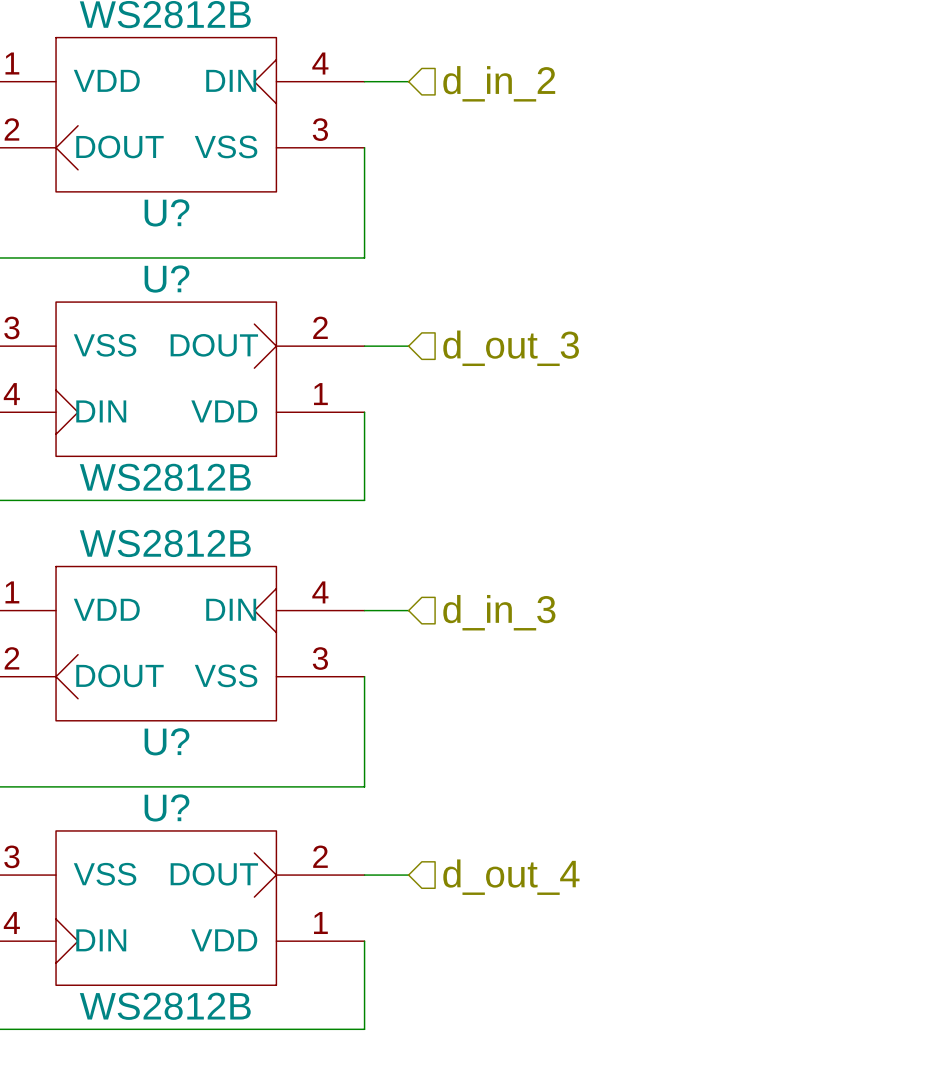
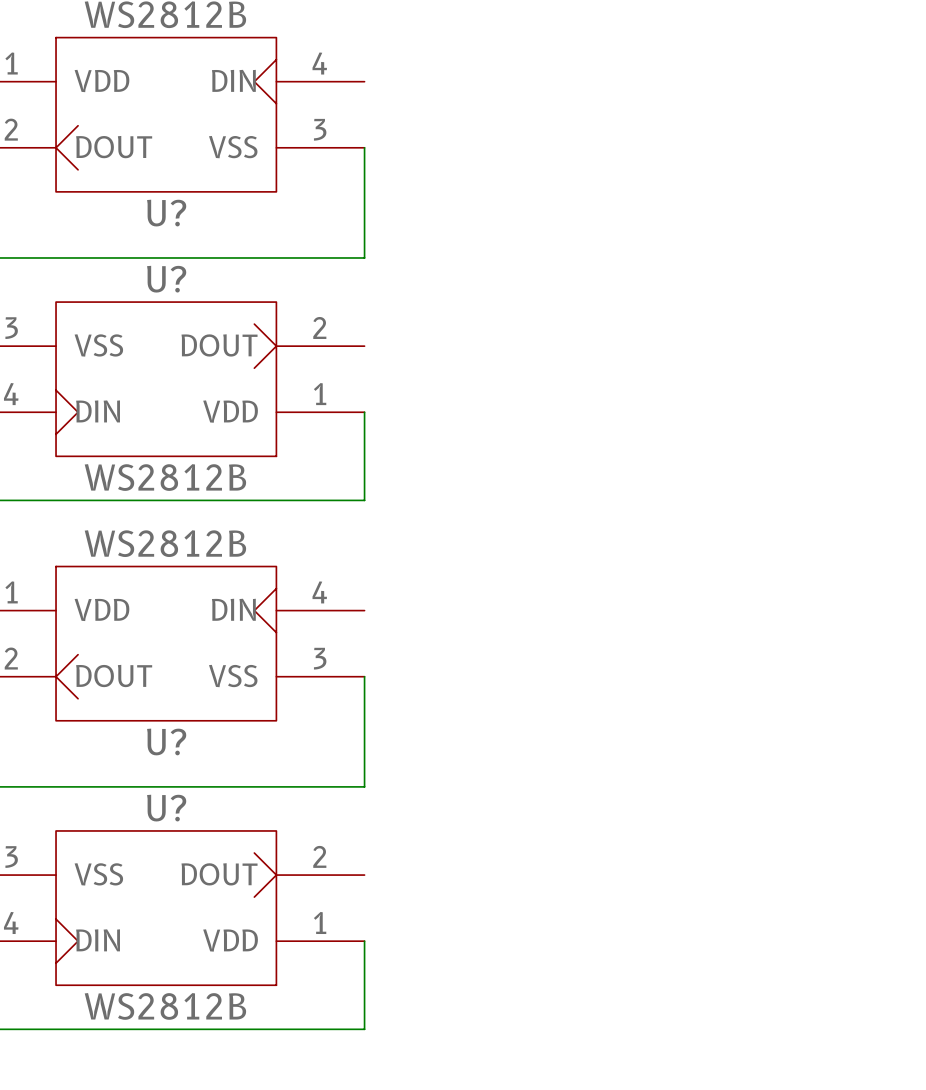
wire: (364, 81) (408, 81) -> none
hierarchical label: d_in_2 (499, 83) -> none
wire: (364, 346) (408, 346) -> none
hierarchical label: d_out_3 (511, 348) -> none
wire: (364, 610) (408, 610) -> none
hierarchical label: d_in_3 (499, 612) -> none
wire: (364, 875) (408, 875) -> none
hierarchical label: d_out_4 (511, 877) -> none

